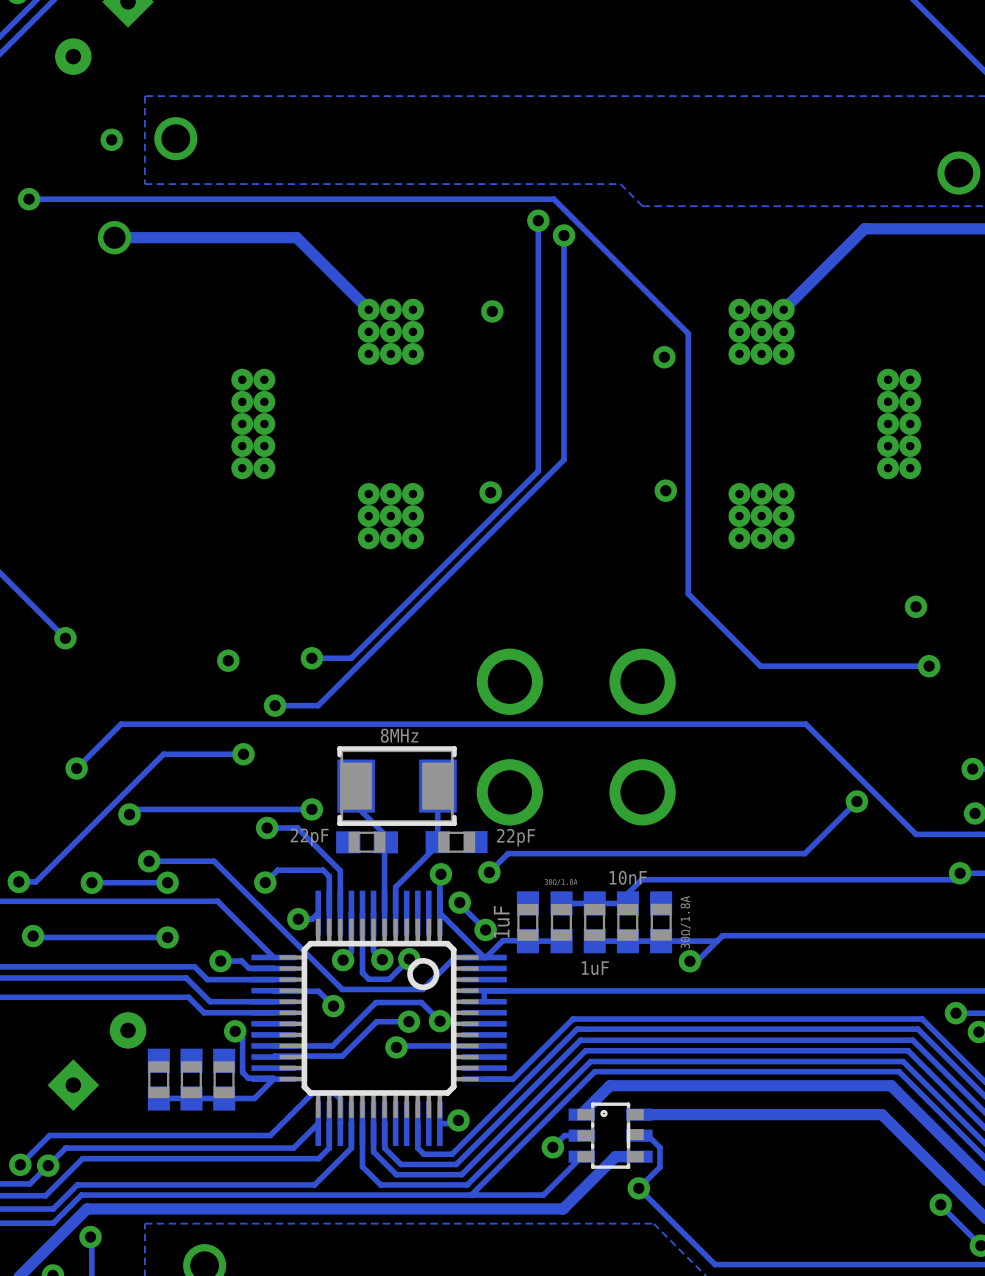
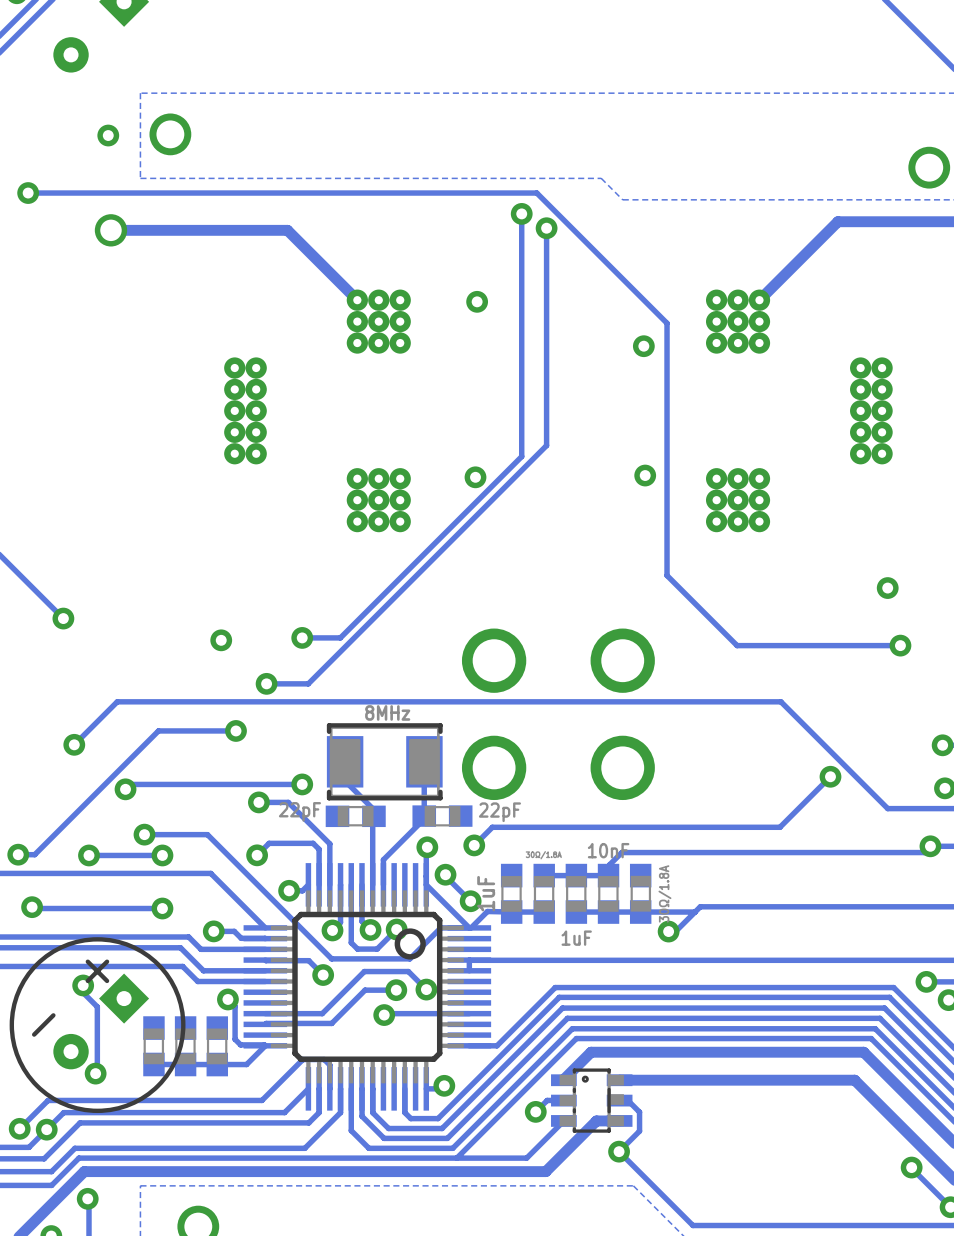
track: none -> (83, 985) (83, 992) (97, 1006) (97, 1071) (95, 1073)
via: none -> (83, 985)
part side: top (96, 1061) -> bottom (97, 1025)
via: none -> (95, 1073)

